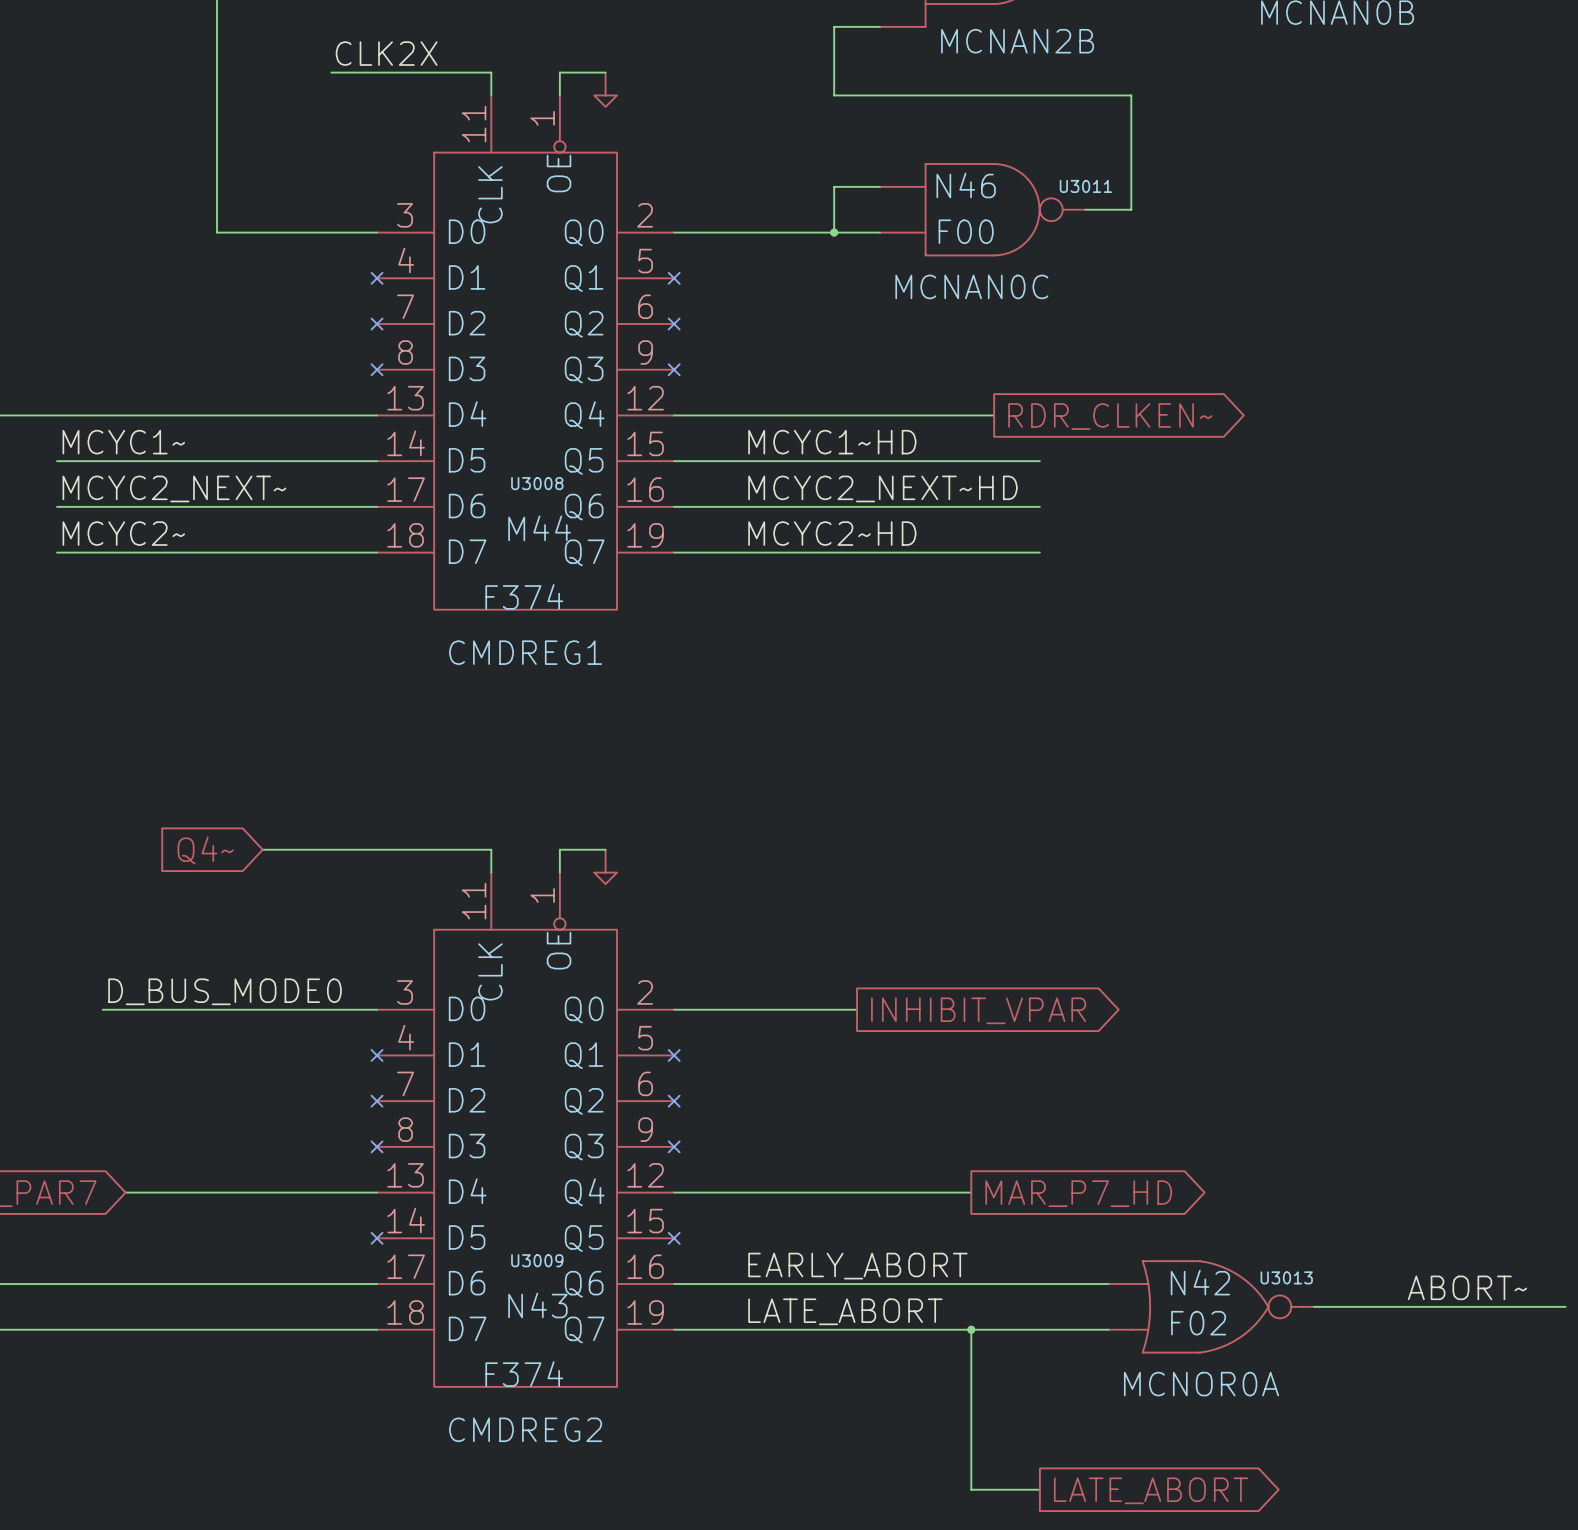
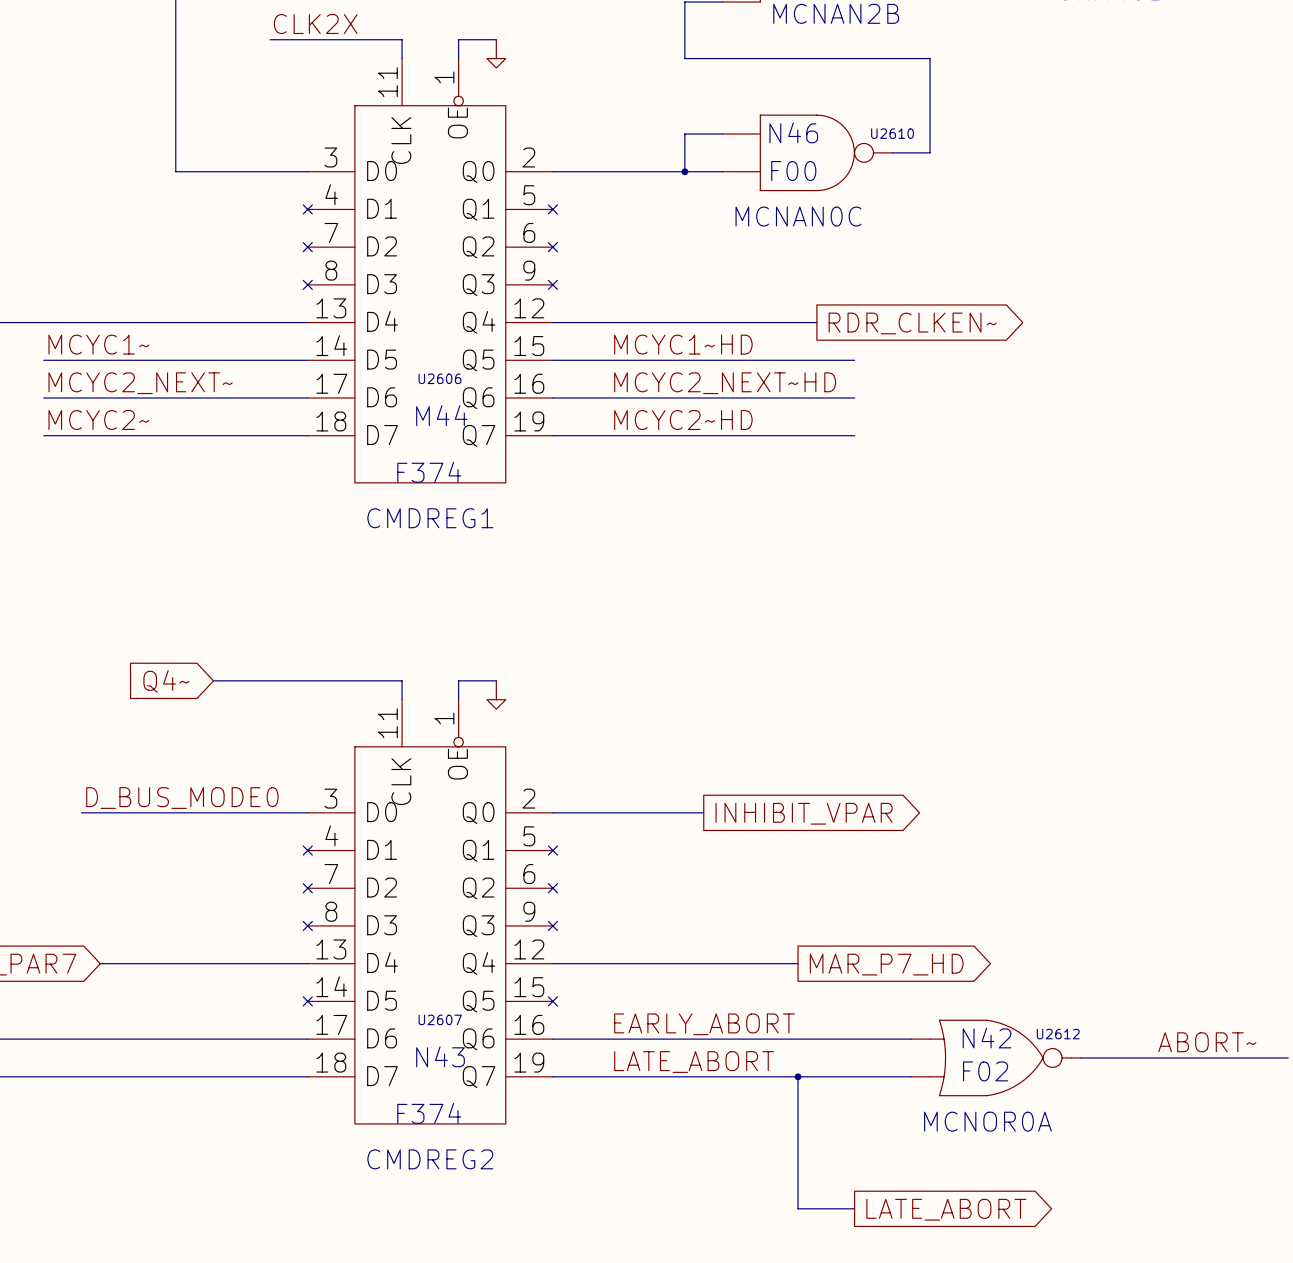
U3011 name: U3011 (1085, 186) -> U2610 (892, 133)
U3008 name: U3008 (537, 483) -> U2606 (439, 378)
U3009 name: U3009 (537, 1260) -> U2607 (440, 1019)
U3013 name: U3013 (1286, 1277) -> U2612 (1058, 1034)

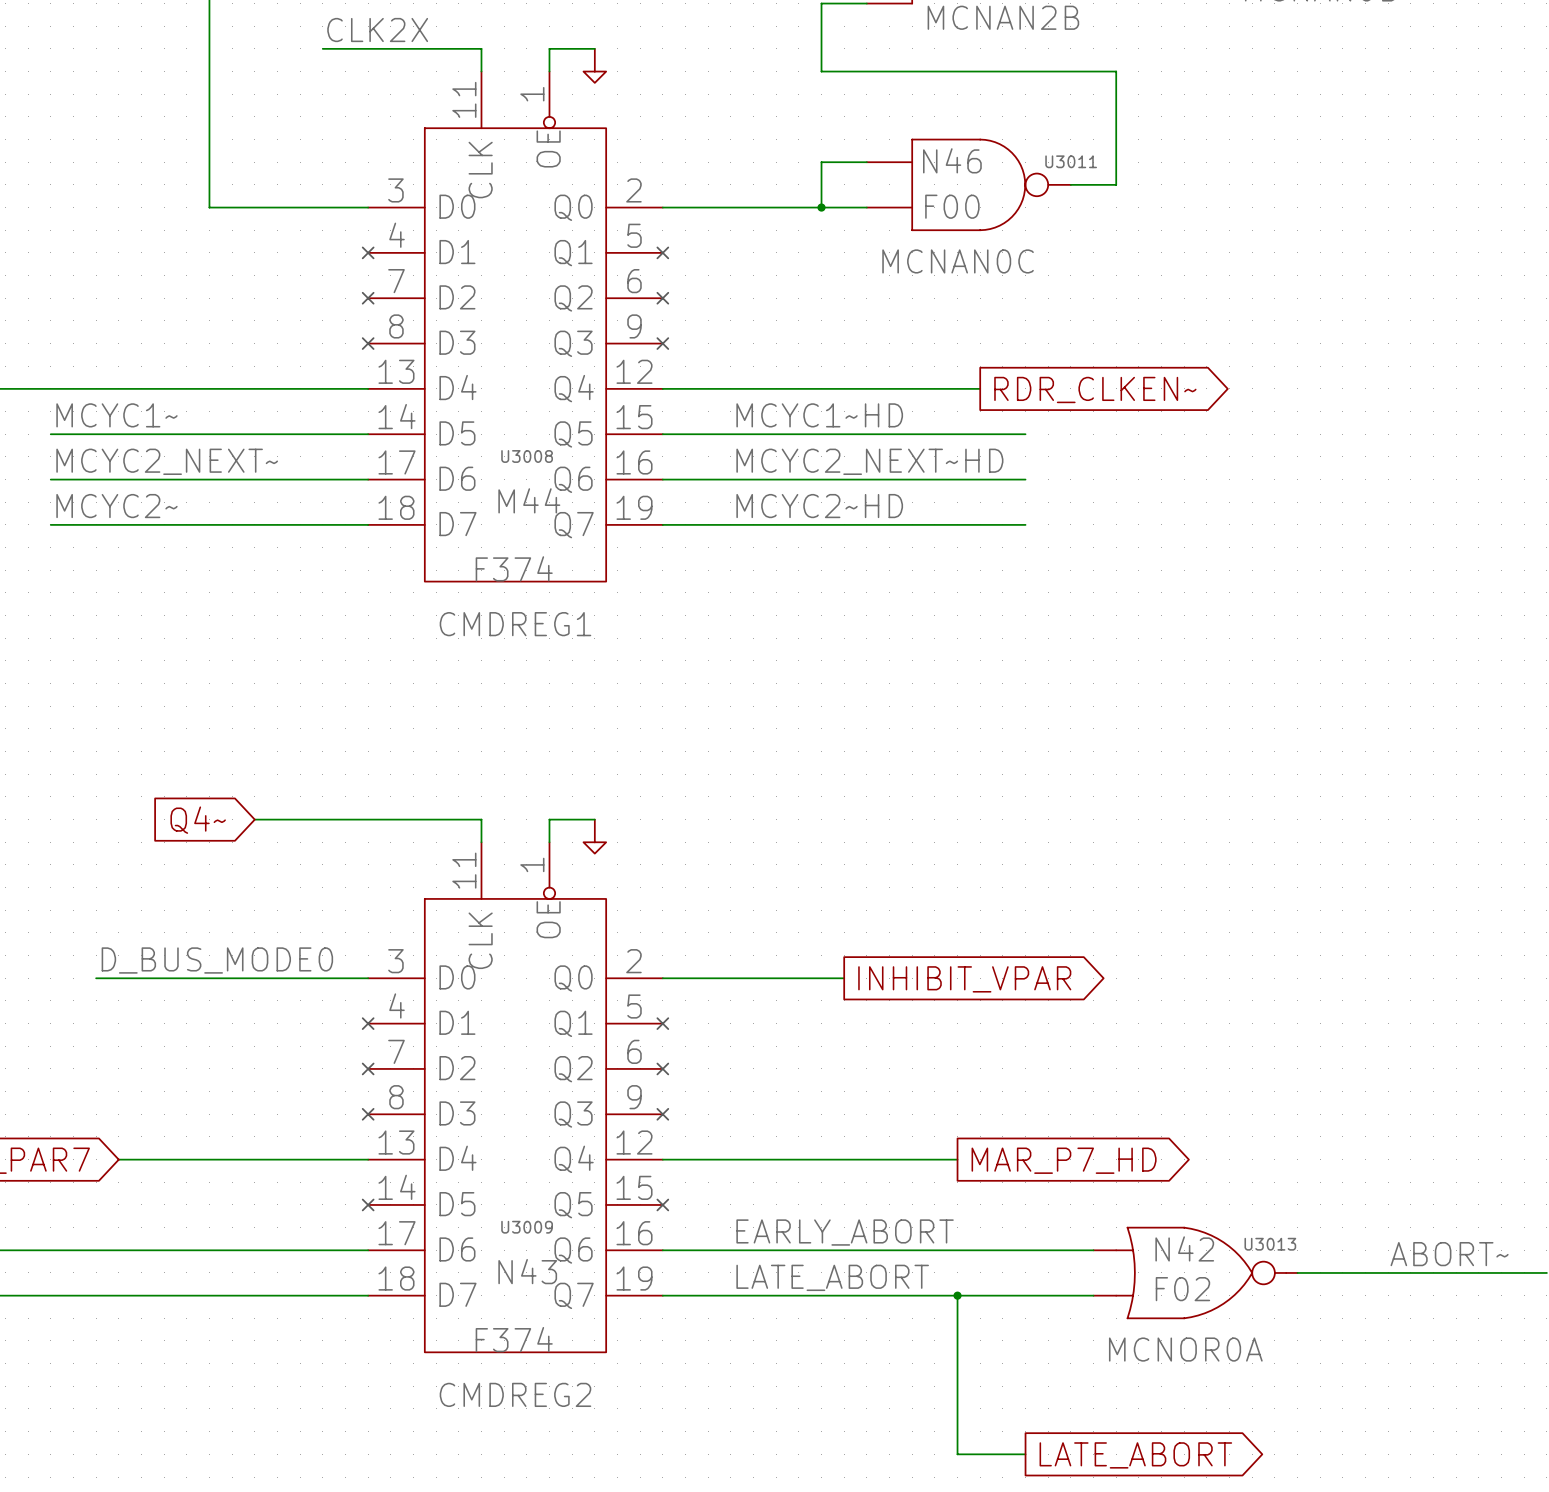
U2610 name: U2610 (892, 133) -> U3011 (1071, 161)
U2606 name: U2606 (439, 378) -> U3008 (527, 456)
U2607 name: U2607 (440, 1019) -> U3009 (527, 1227)
U2612 name: U2612 (1058, 1034) -> U3013 (1270, 1244)

